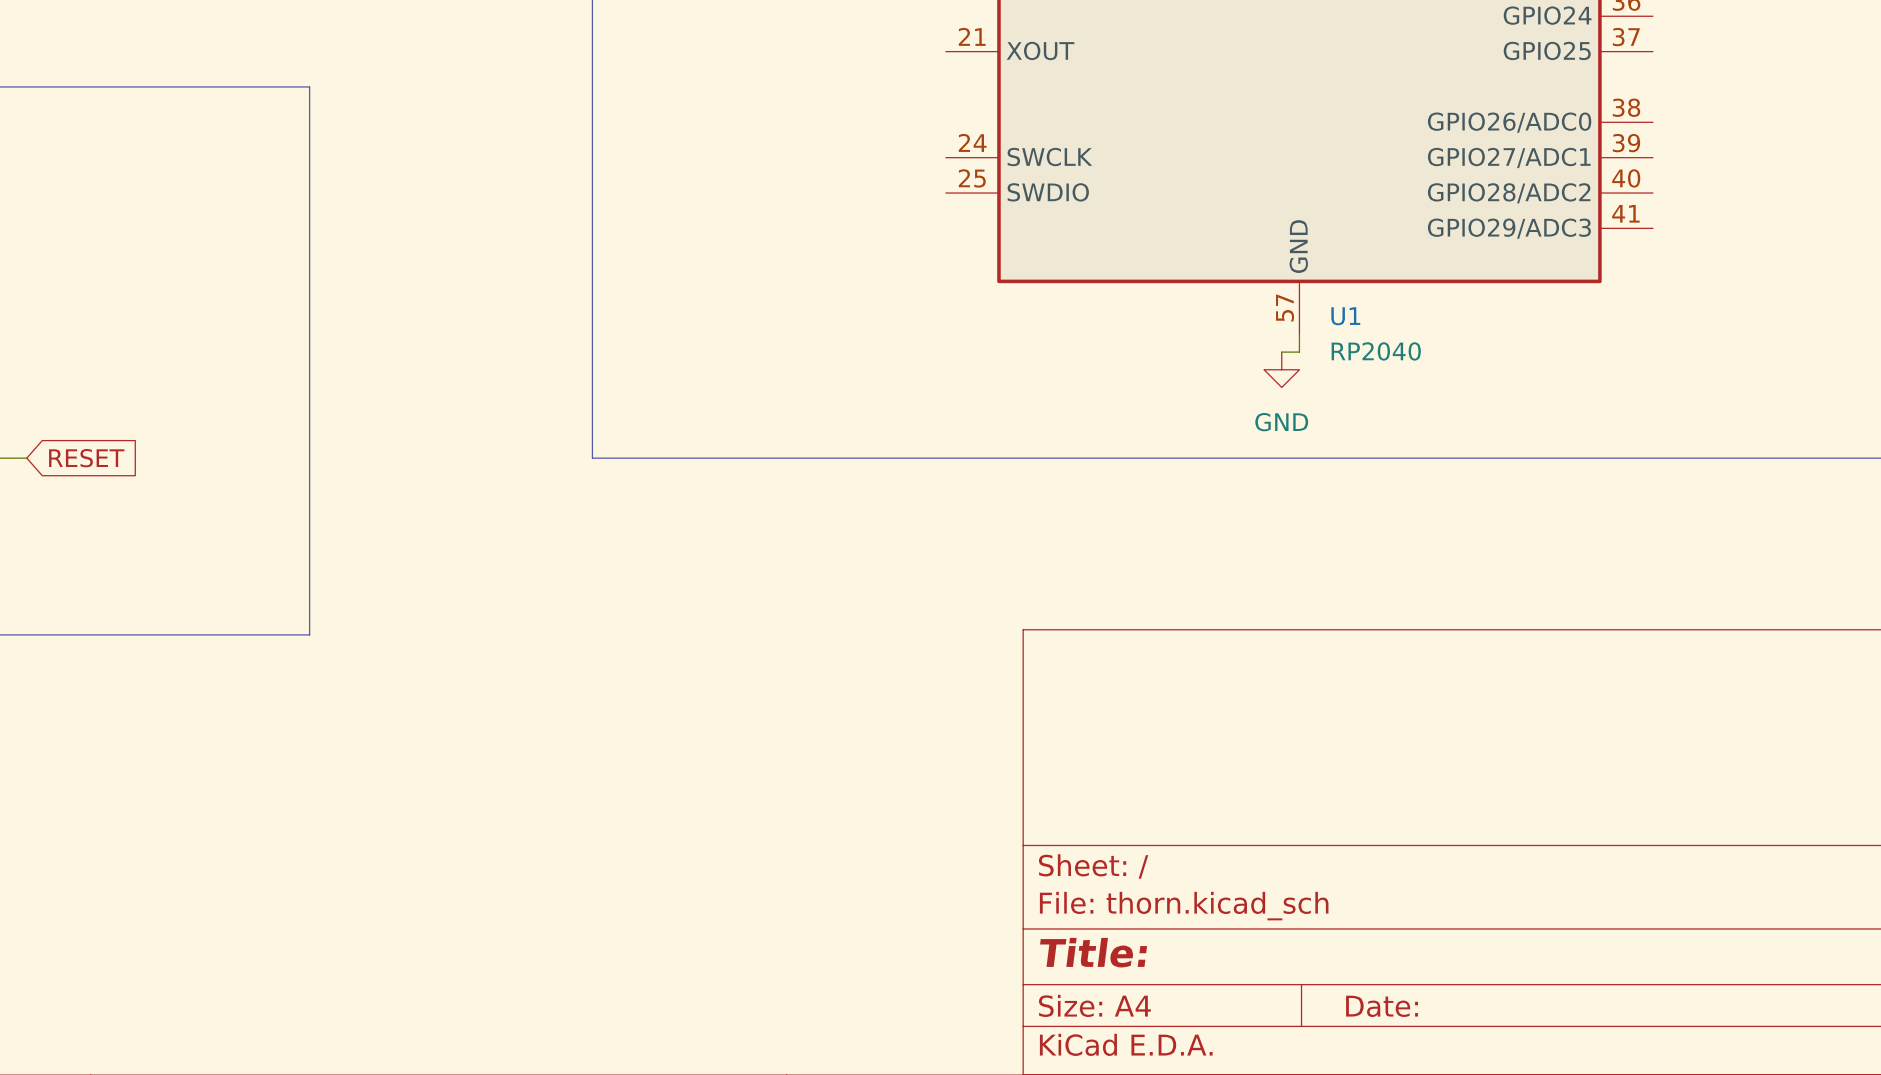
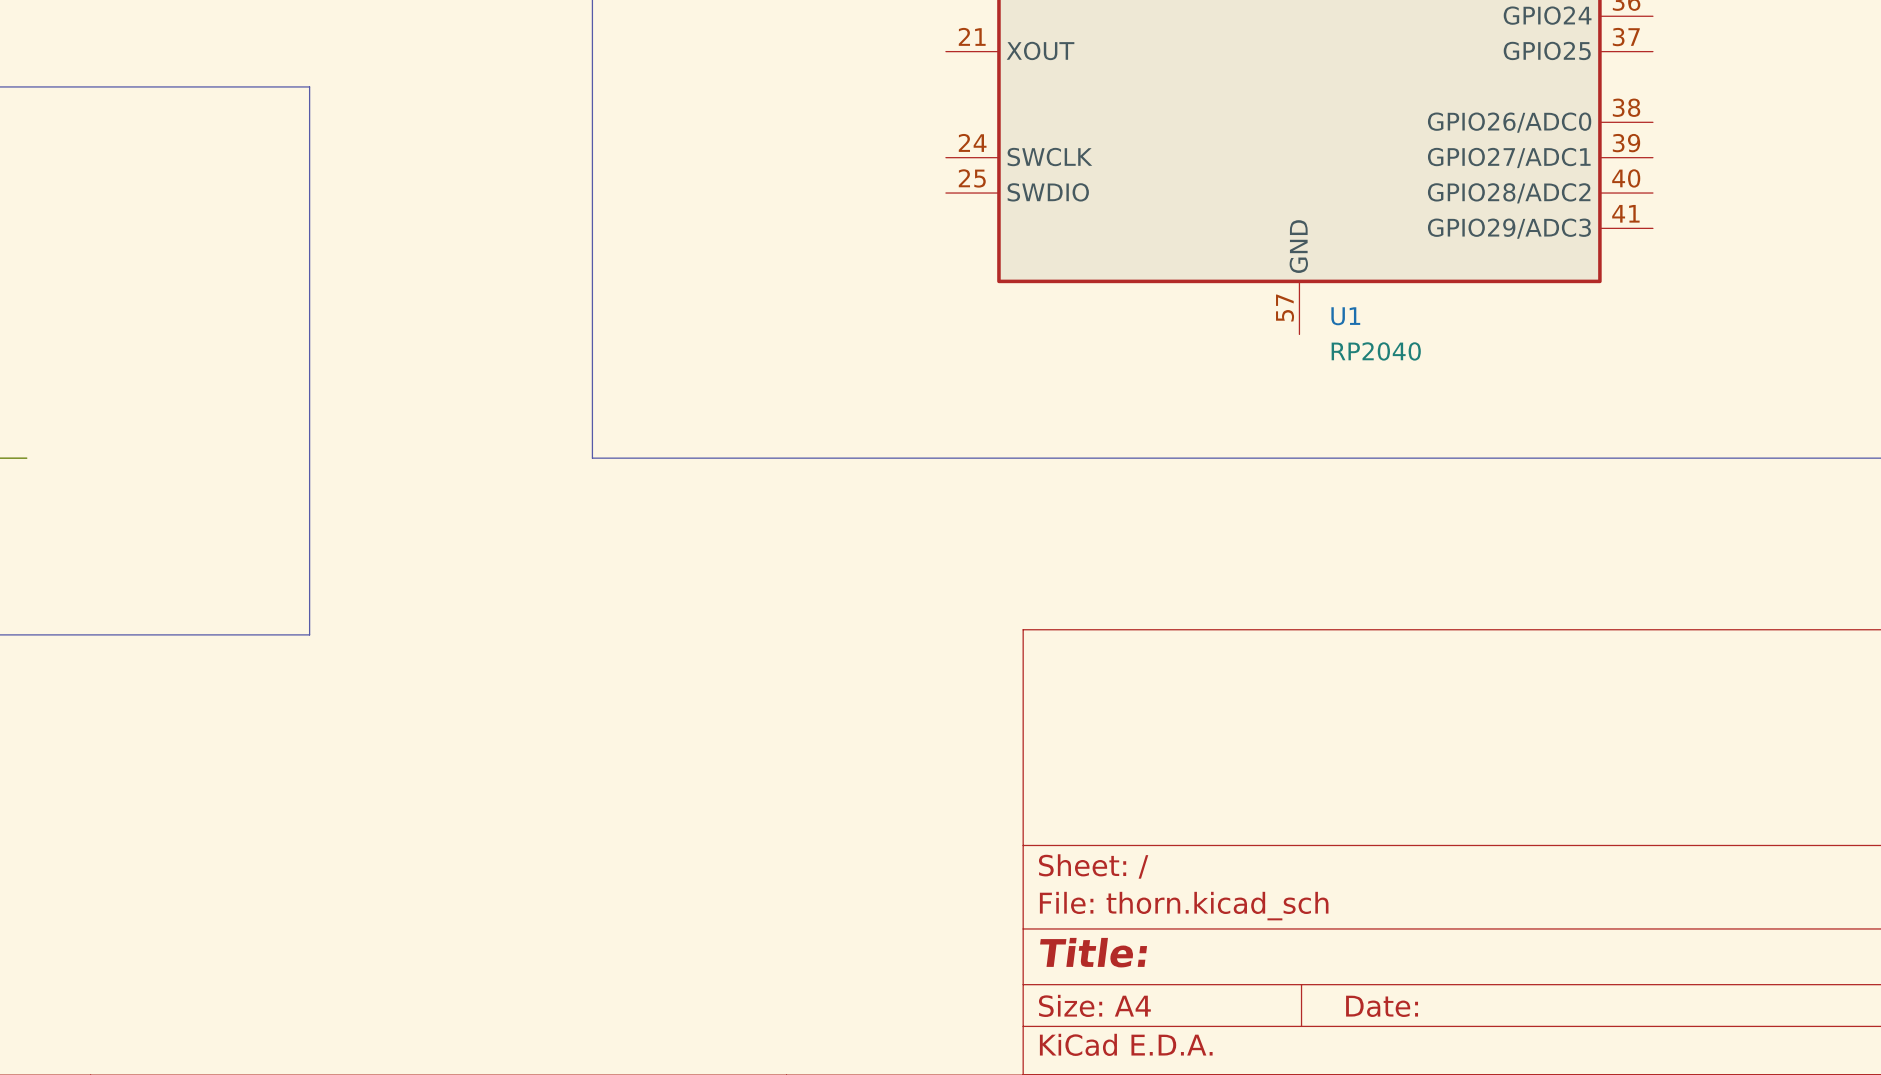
wire: (1299, 334) (1299, 352) (1281, 352) -> none
power symbol: GND (1281, 369) -> none
global label: RESET (86, 458) -> none

